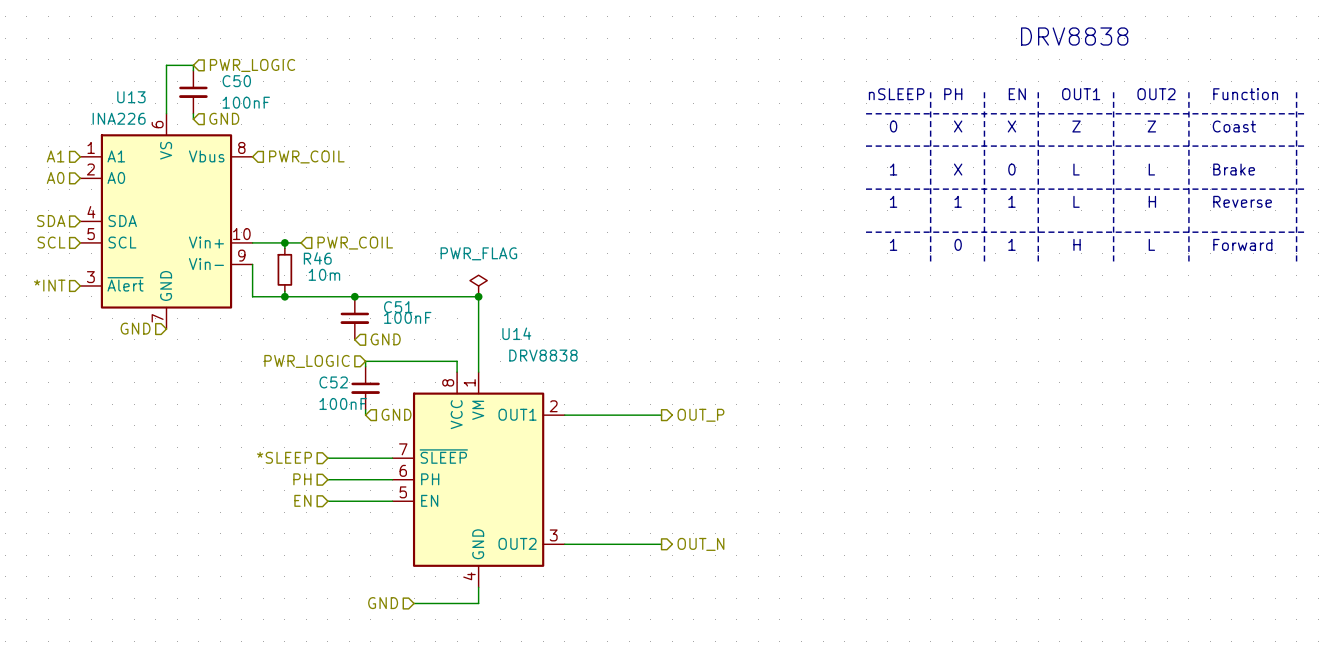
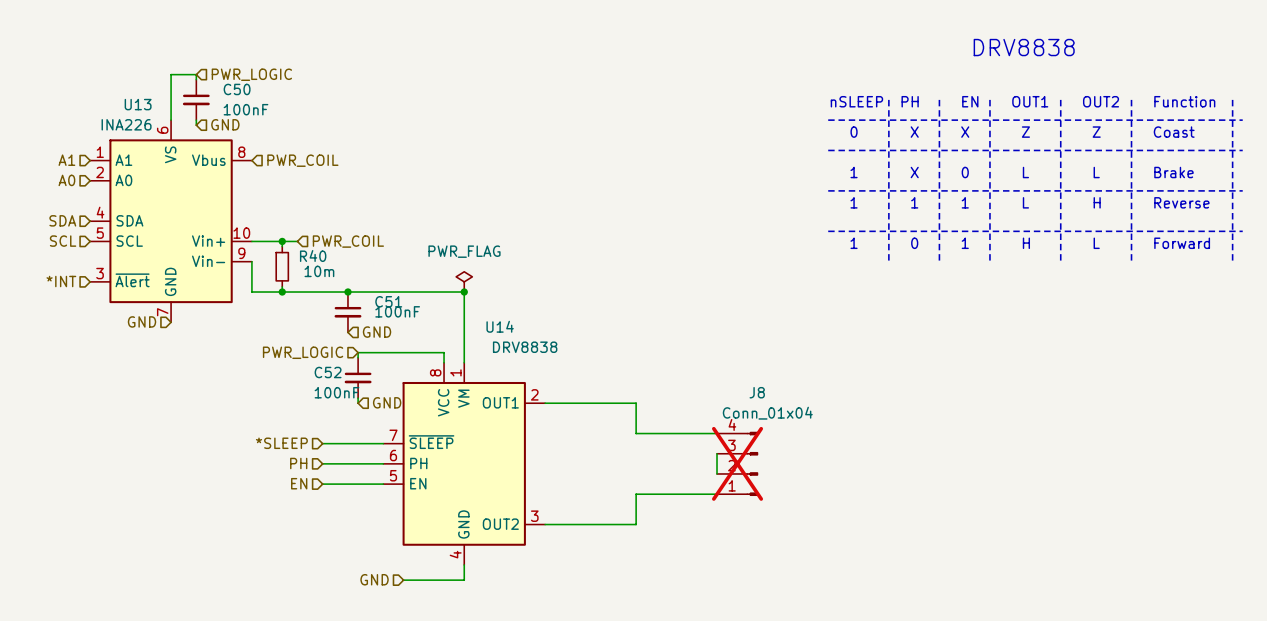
R46 name: R46 (317, 258) -> R40 (313, 256)
wire: none -> (636, 403) (636, 433) (717, 433)
hierarchical label: OUT_P (700, 415) -> none
wire: none -> (717, 453) (717, 473)
J8: none -> Conn_01x04 (737, 463)
wire: none -> (717, 494) (636, 494) (636, 524)
hierarchical label: OUT_N (700, 544) -> none

